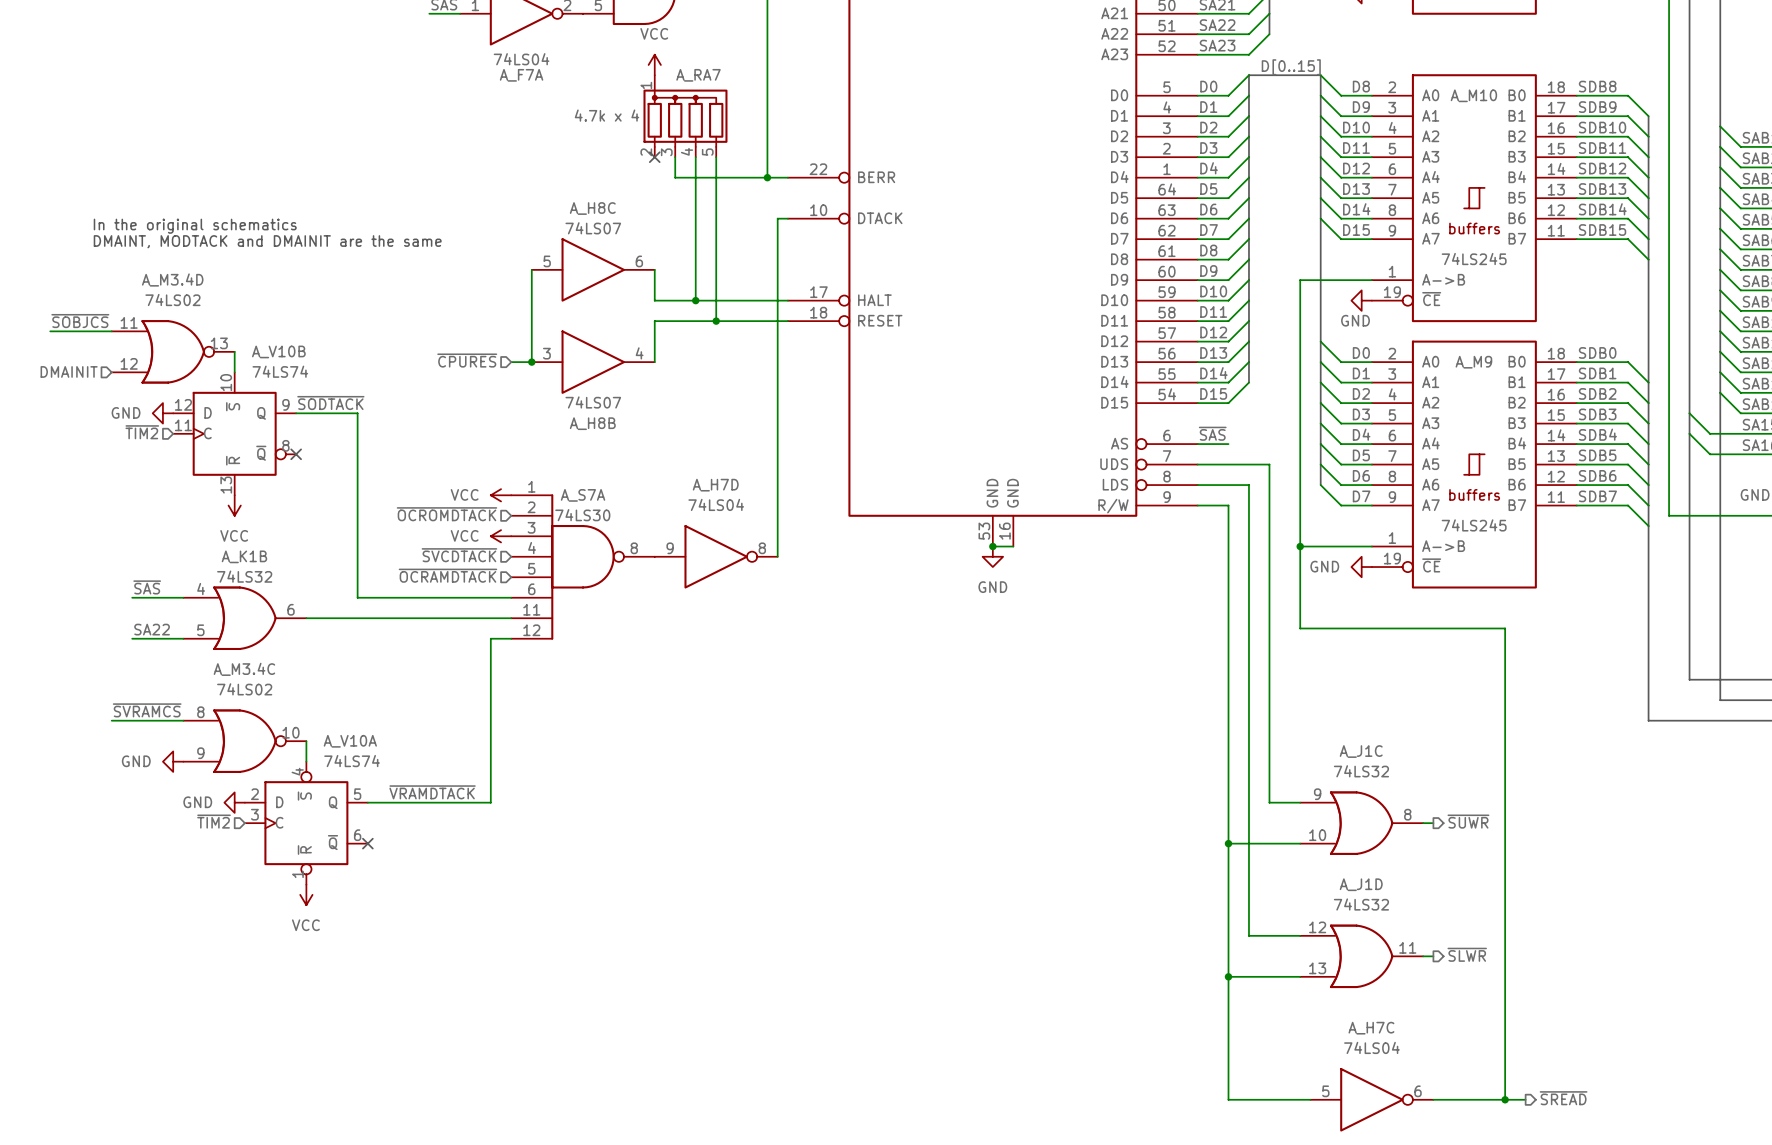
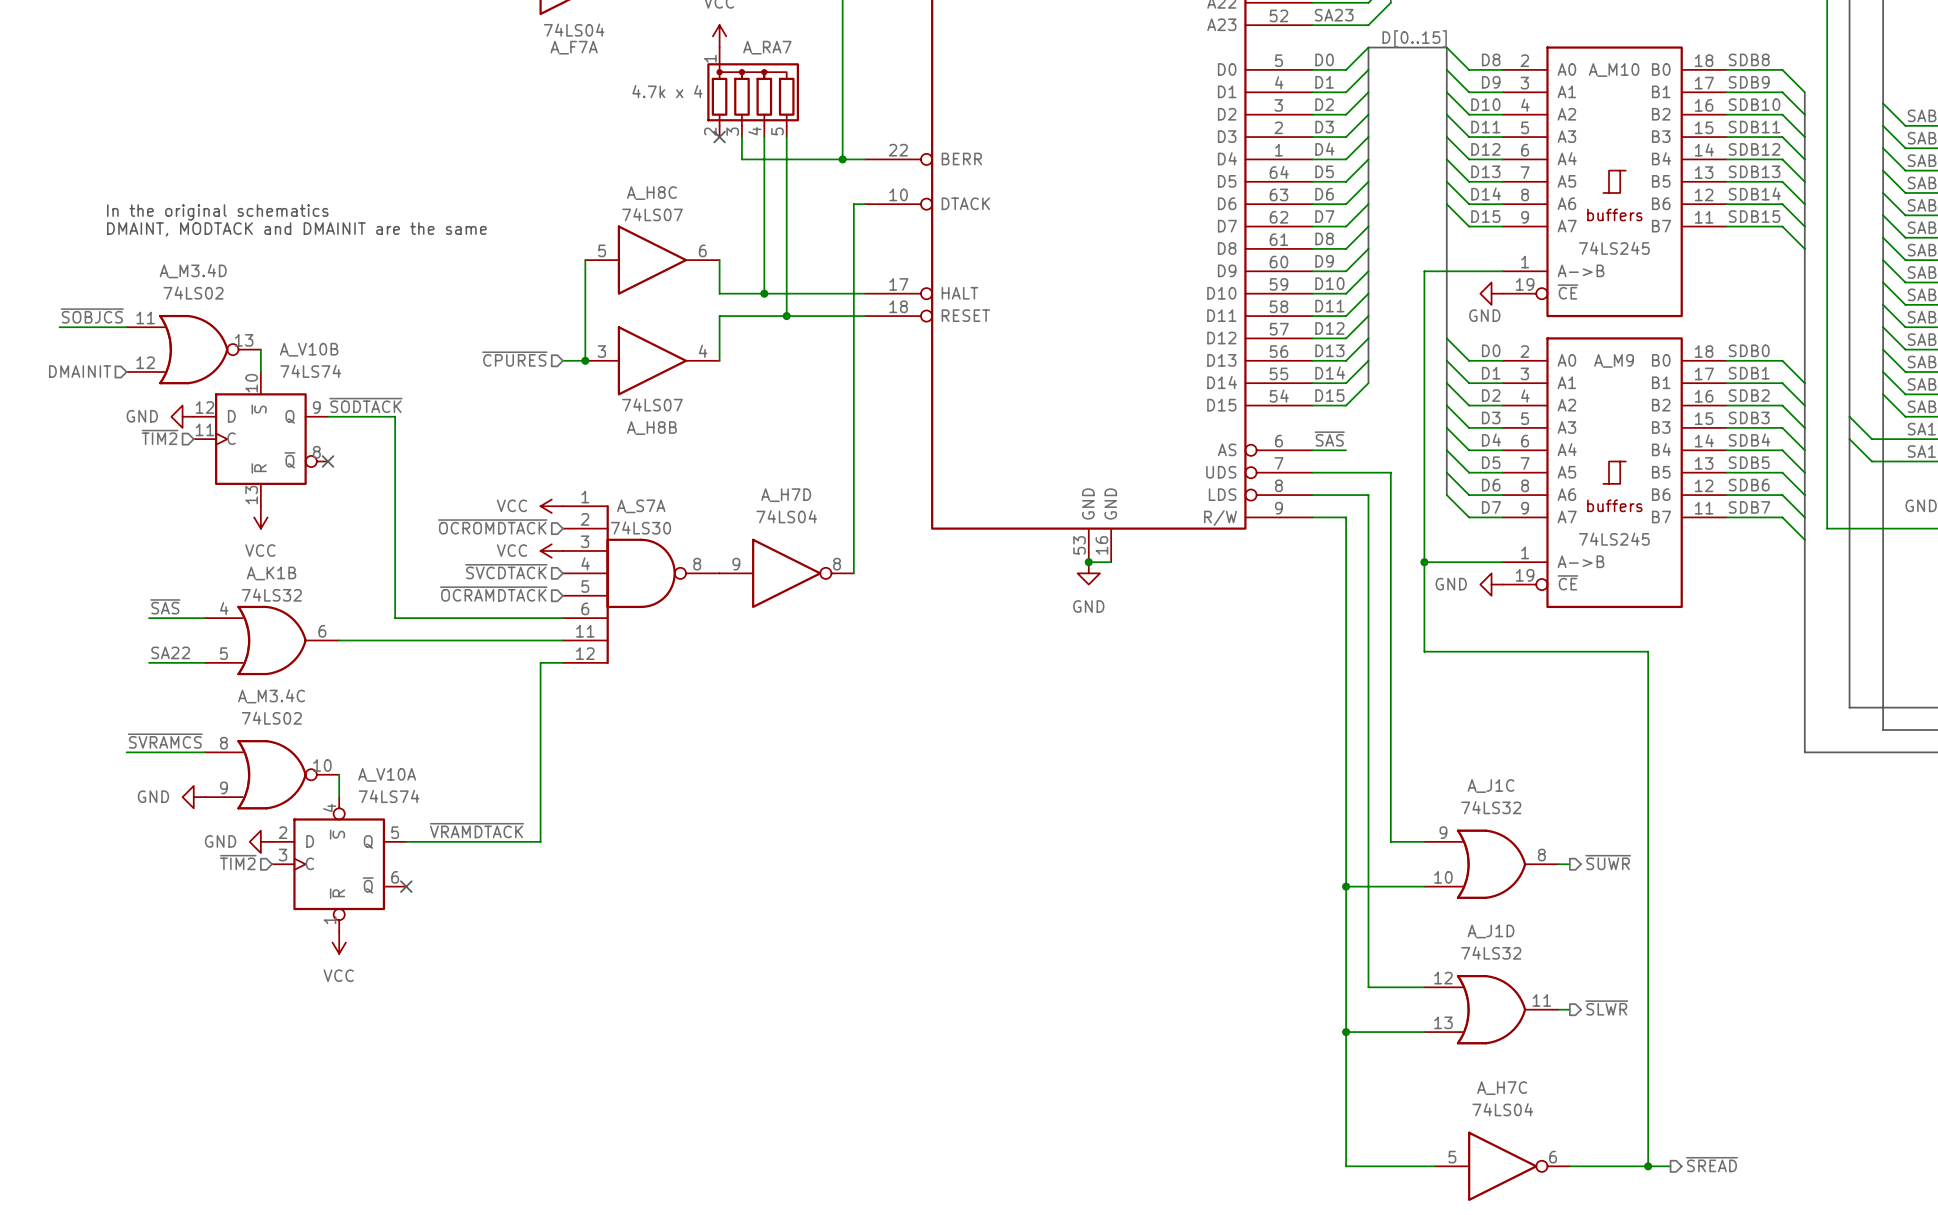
label position: ~{SAS} (1212, 433) -> ~{SAS} (1329, 439)

